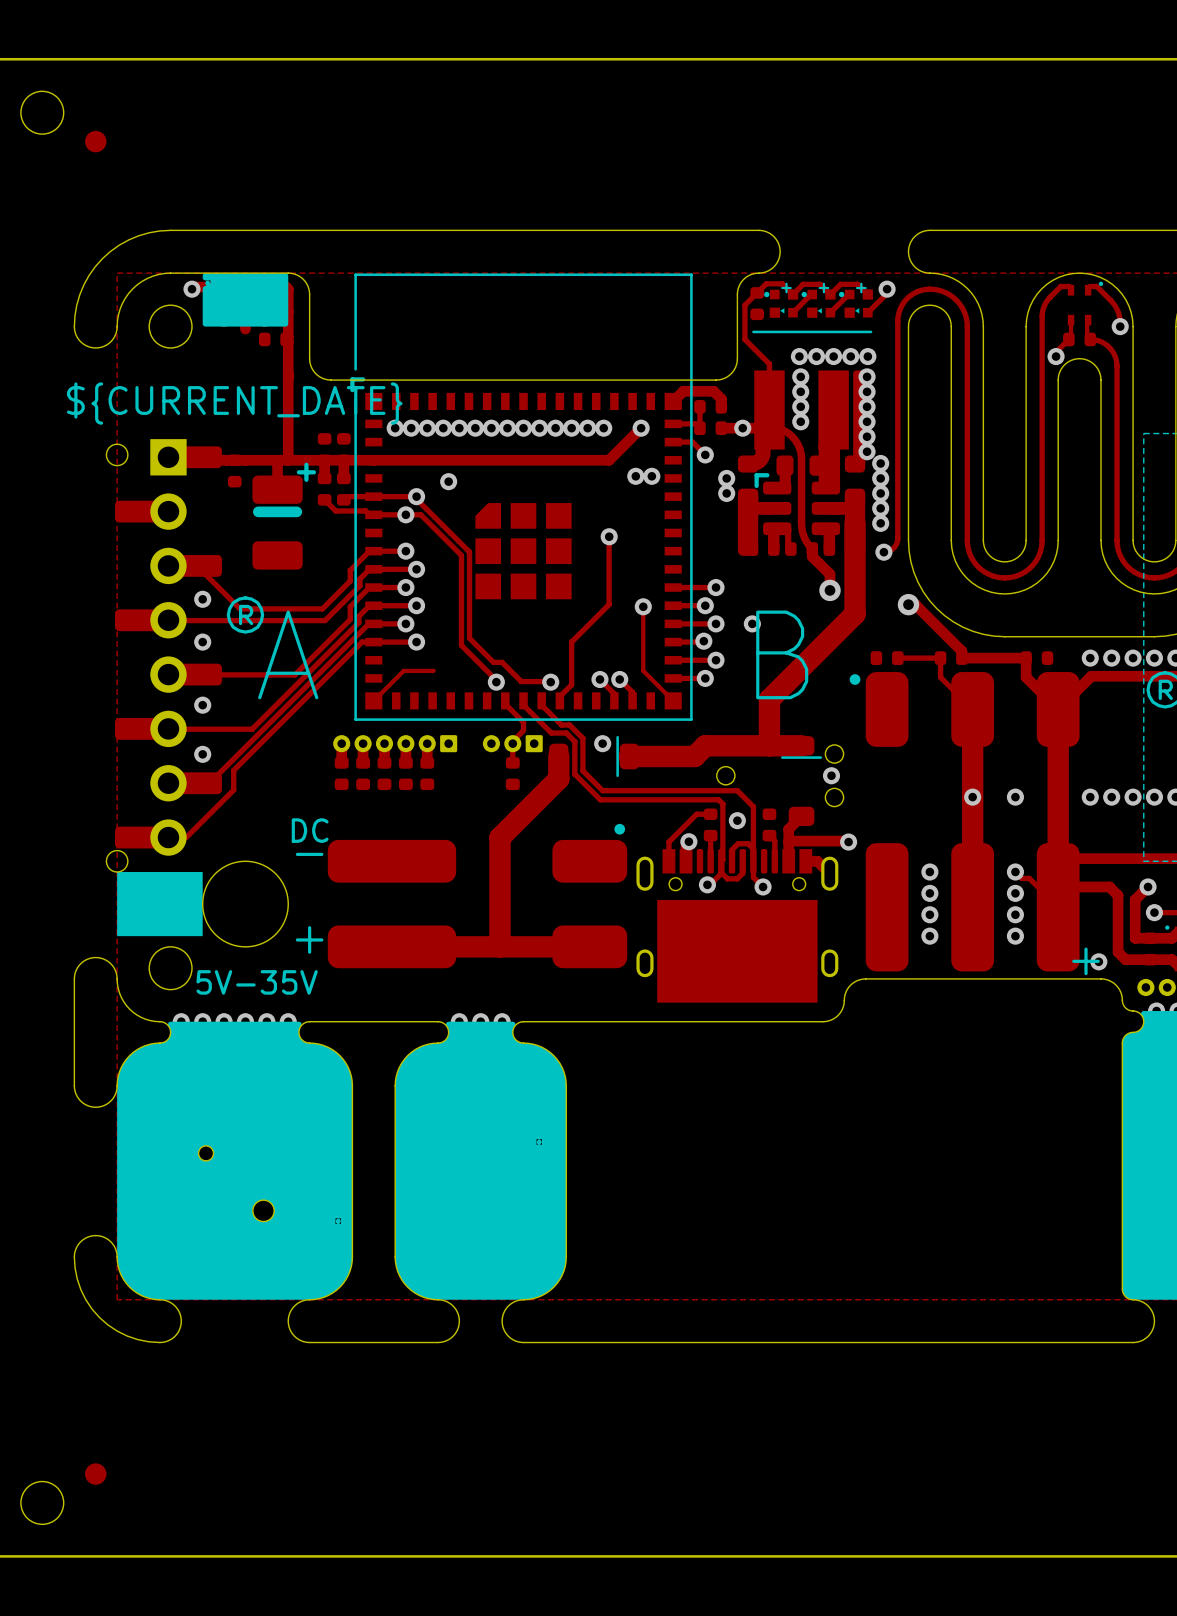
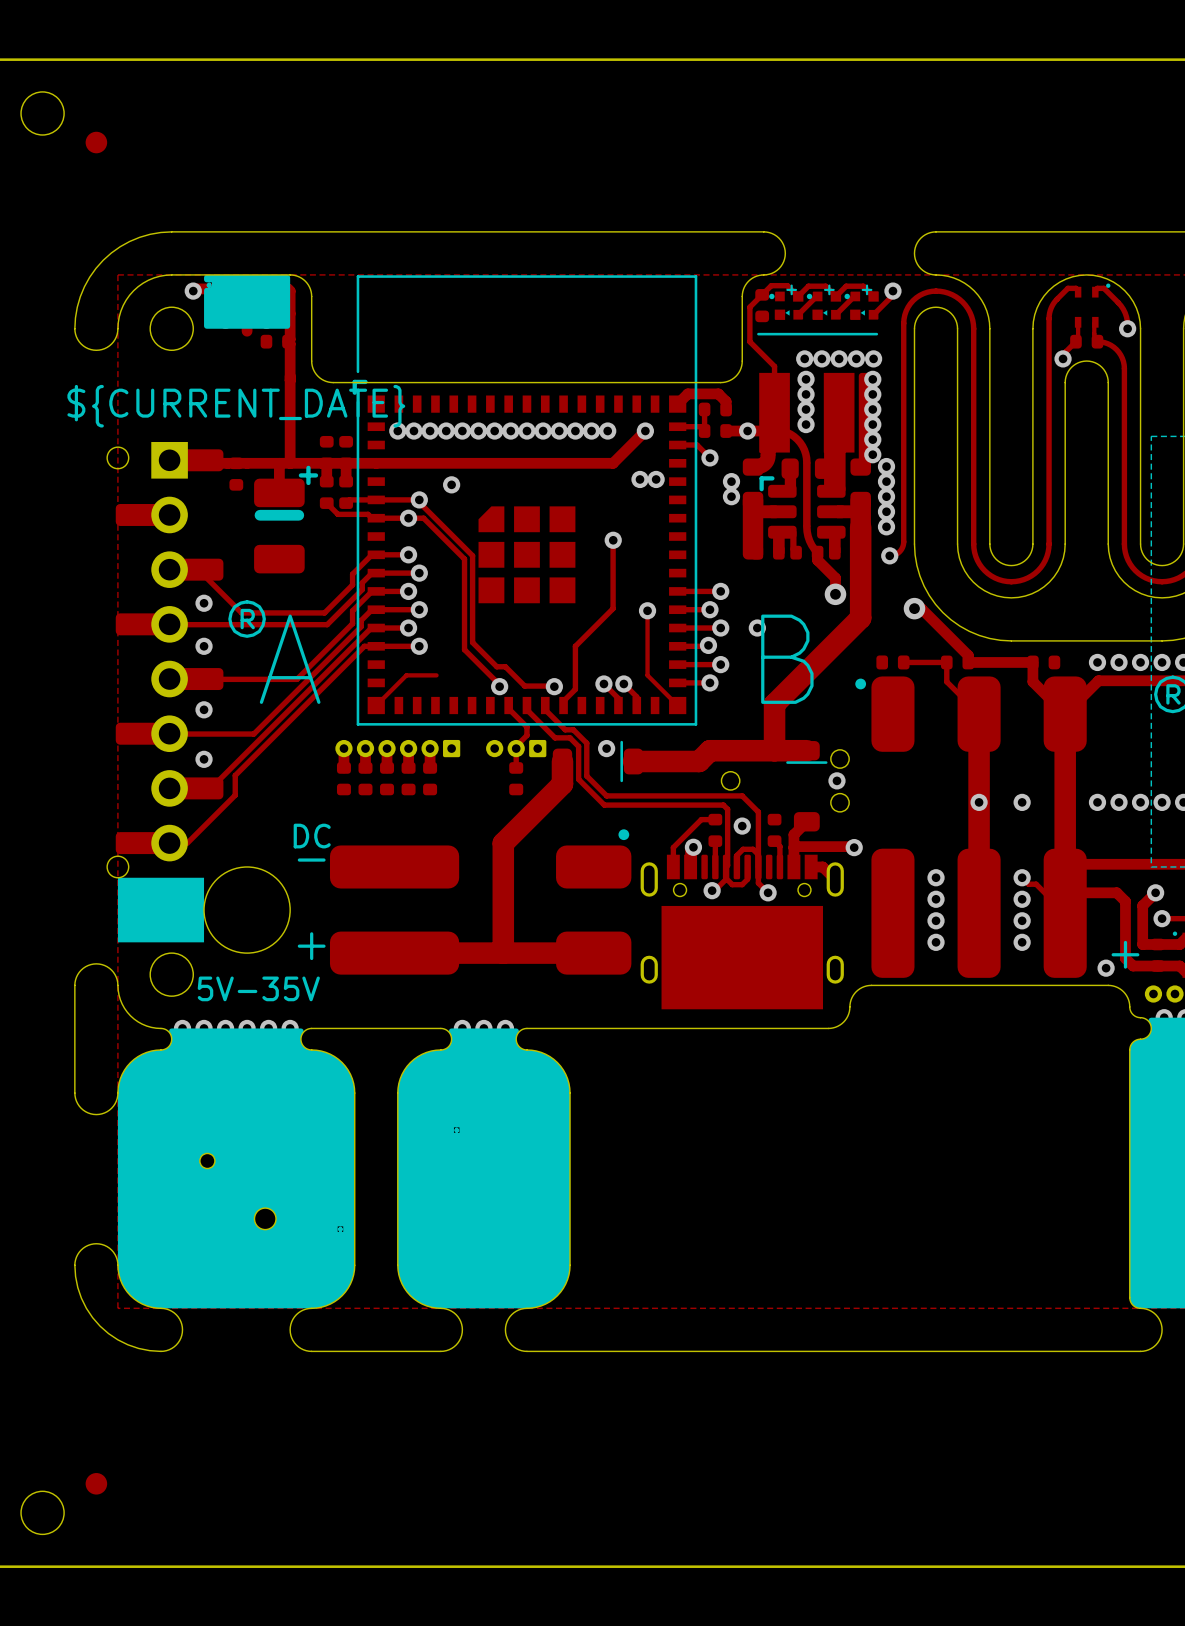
text position: + (1086, 961) -> + (1125, 954)
drawing shape: [395, 1021, 567, 1300] -> [397, 1028, 571, 1309]
text position: . (539, 1142) -> . (456, 1130)

